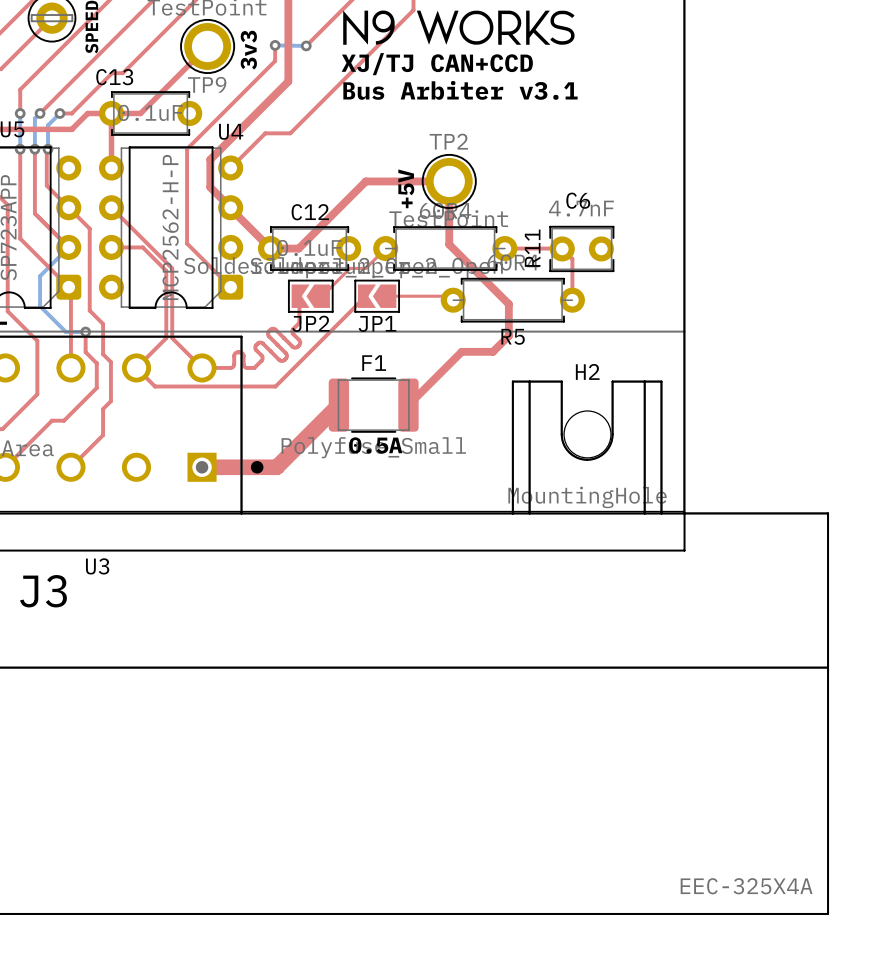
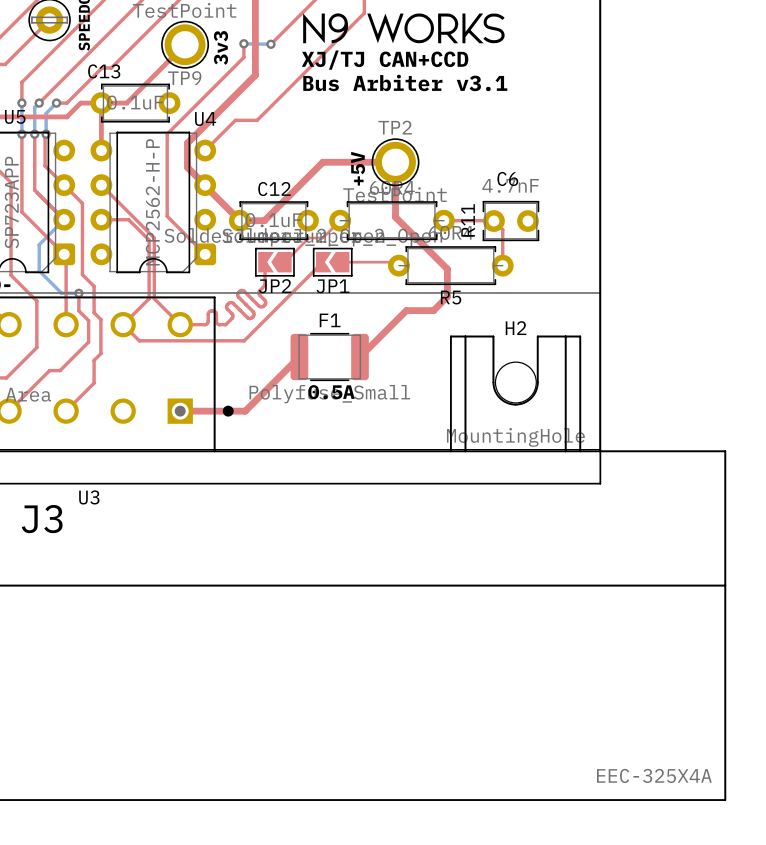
top track width: thick (338, 405) (276, 467) (202, 467) -> thin (299, 357) (245, 411) (180, 411)

